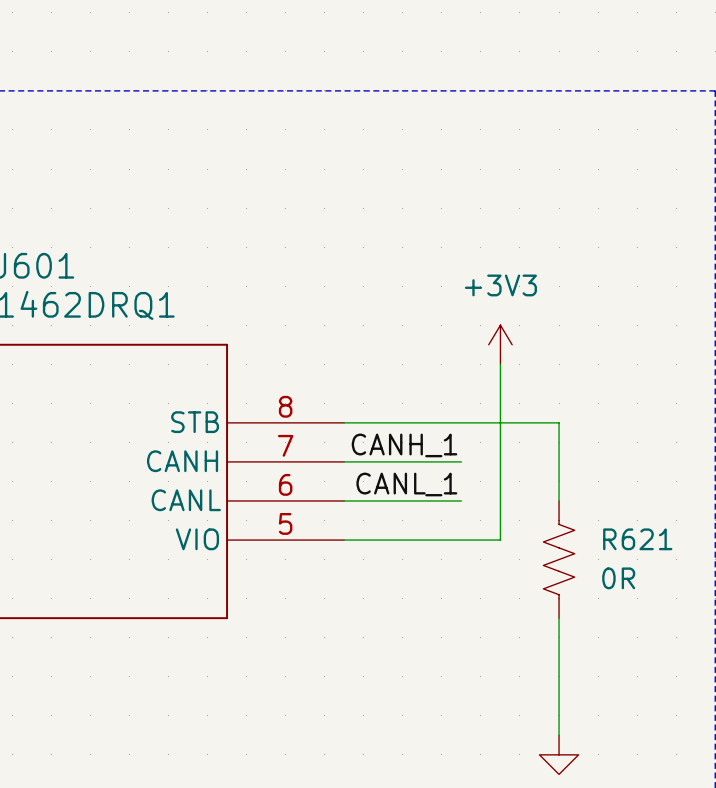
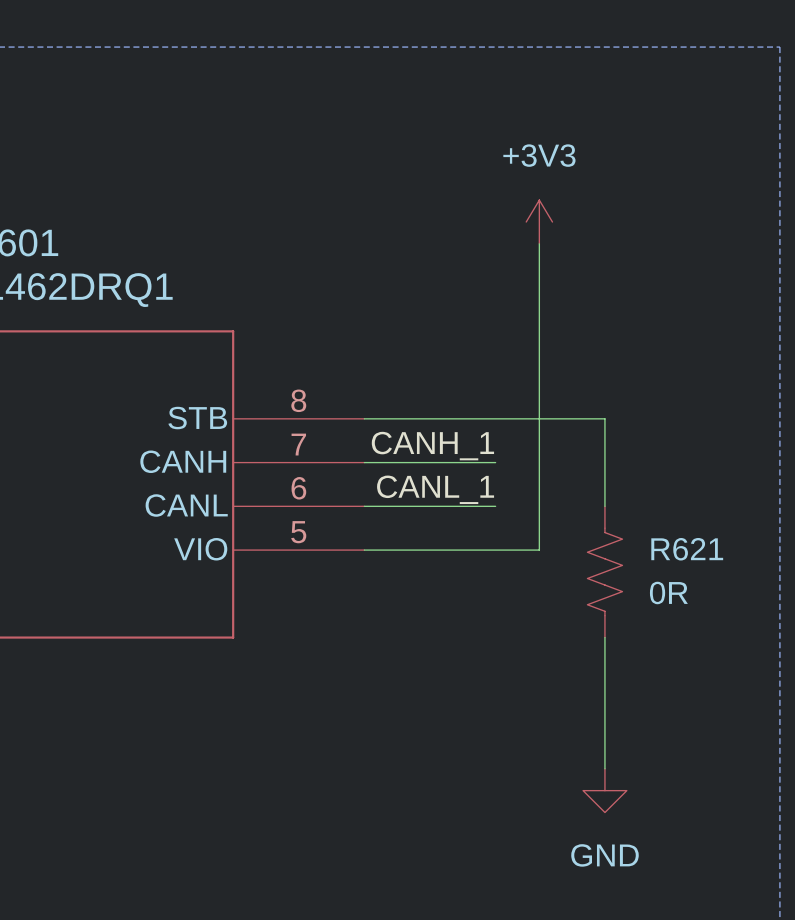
wire: none -> (539, 243) (539, 353)
power symbol position: +3V3 (500, 344) -> +3V3 (539, 222)

